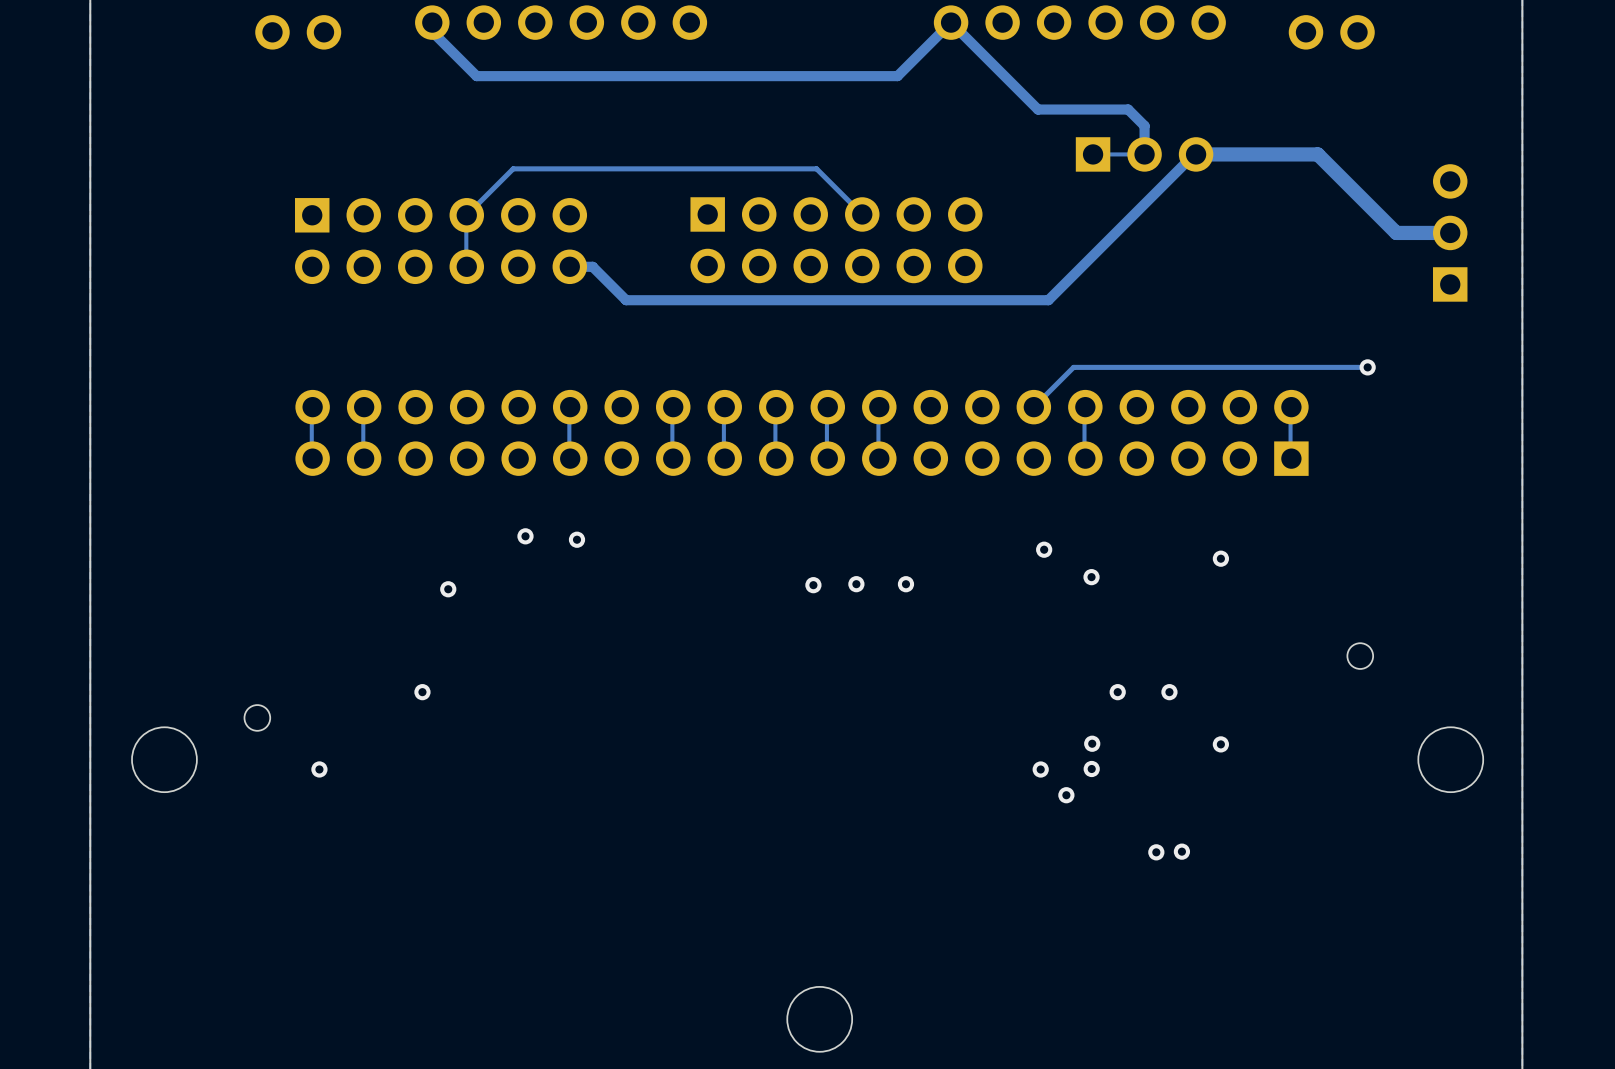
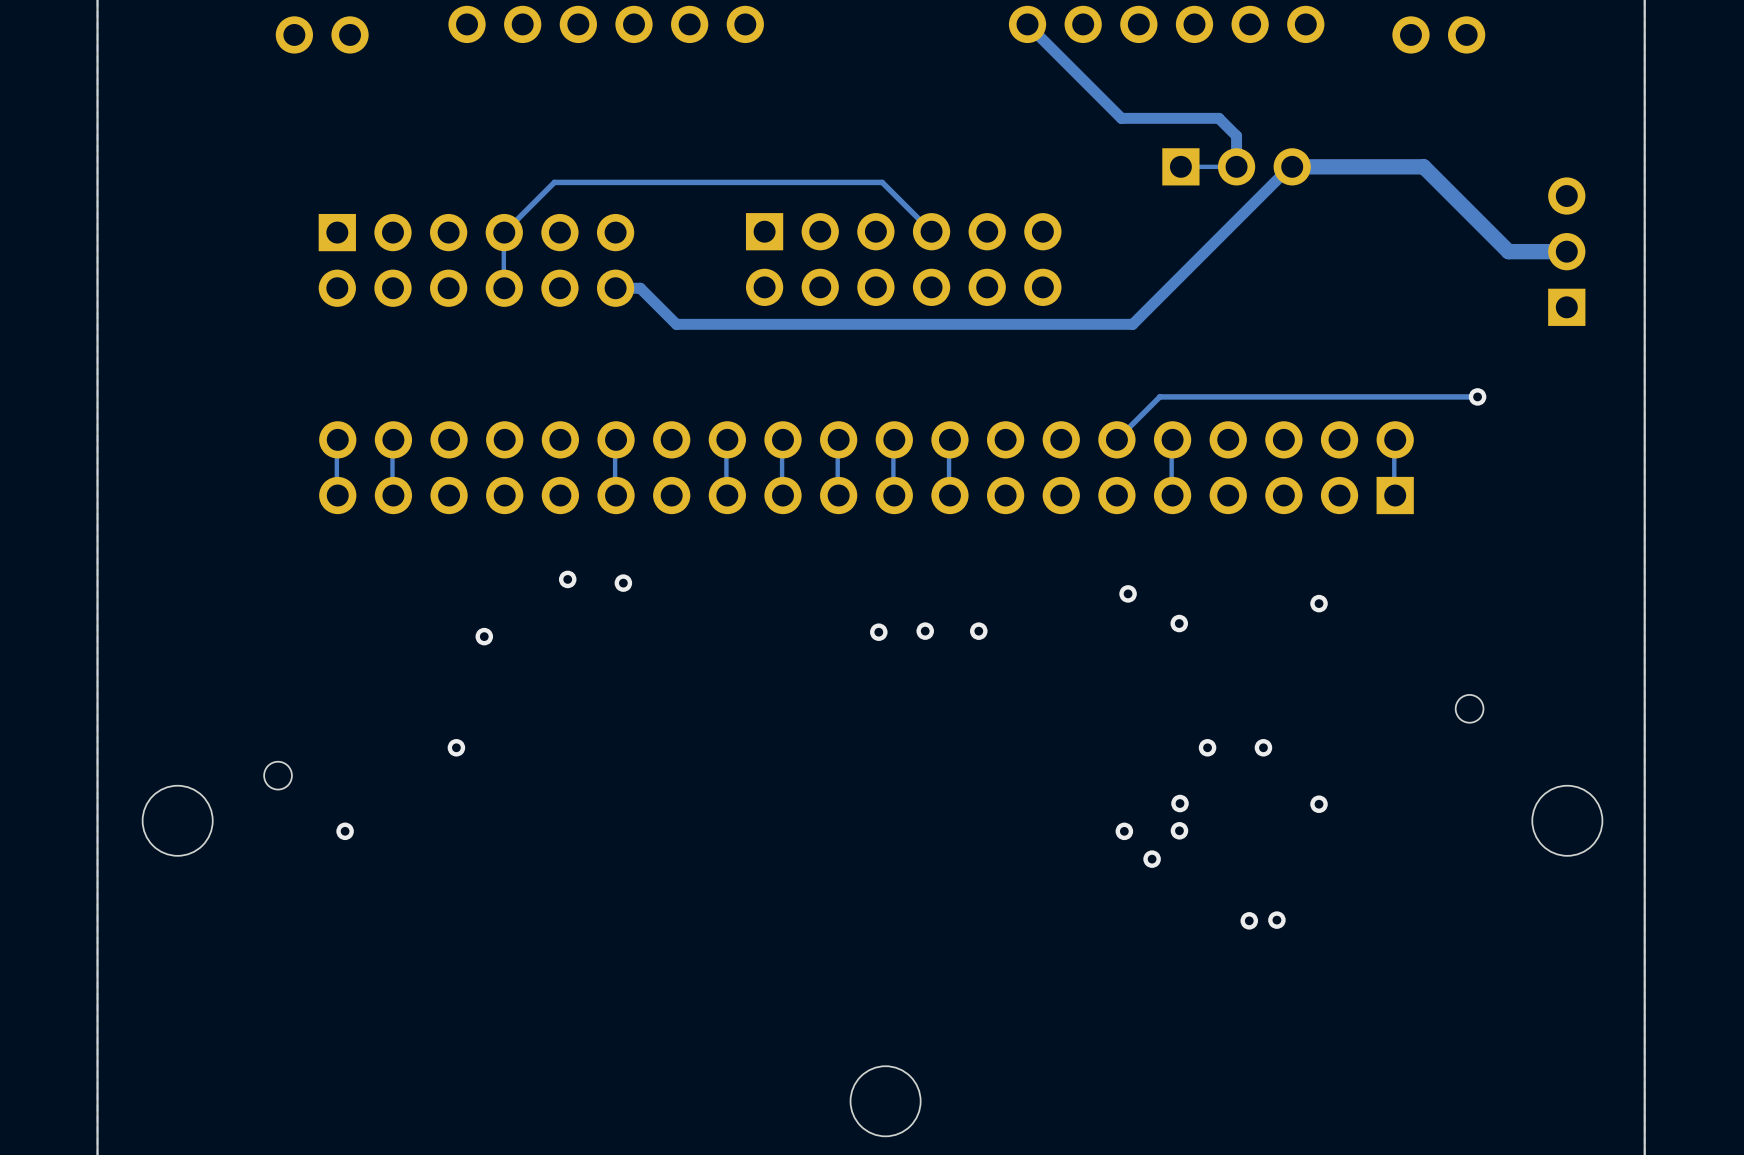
track: (951, 22) (897, 76) (476, 76) (427, 27) -> none

